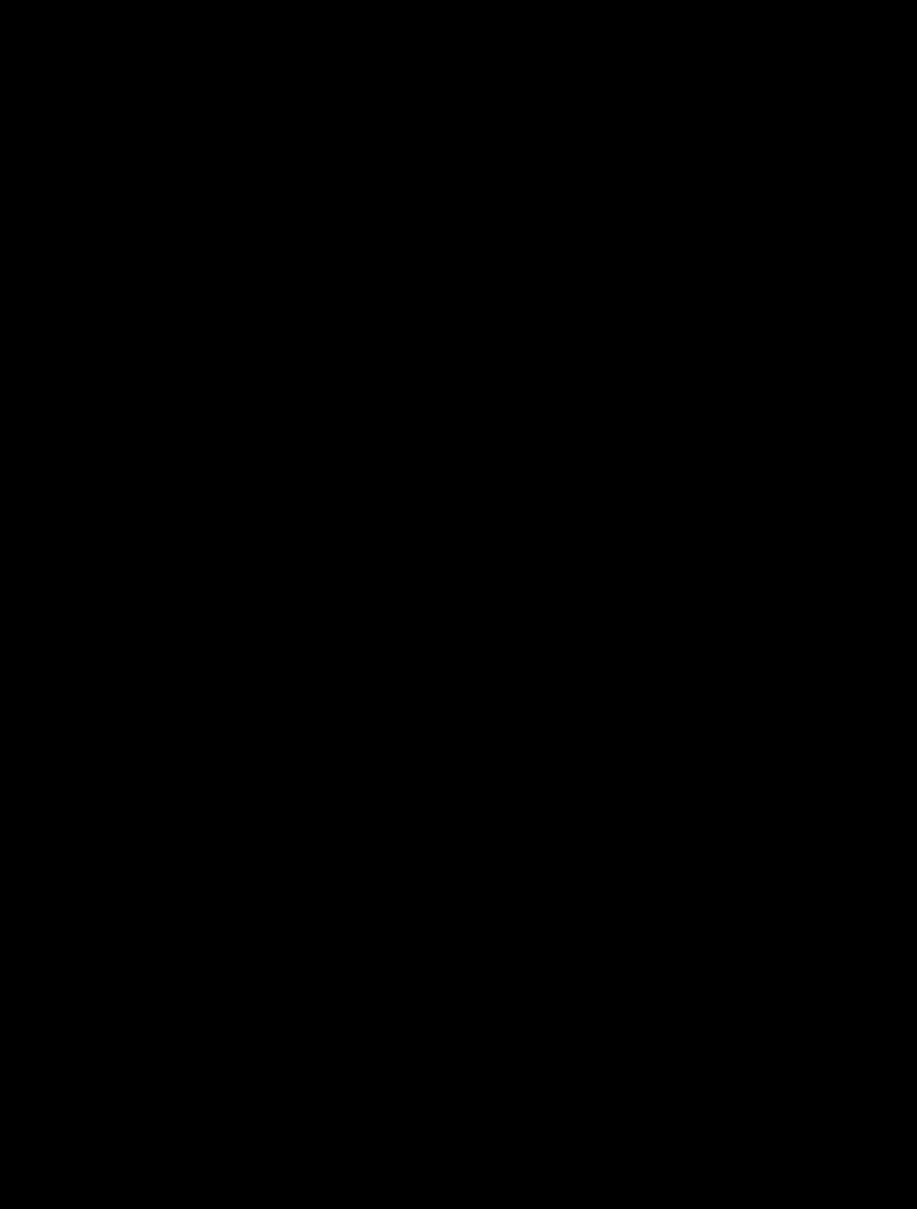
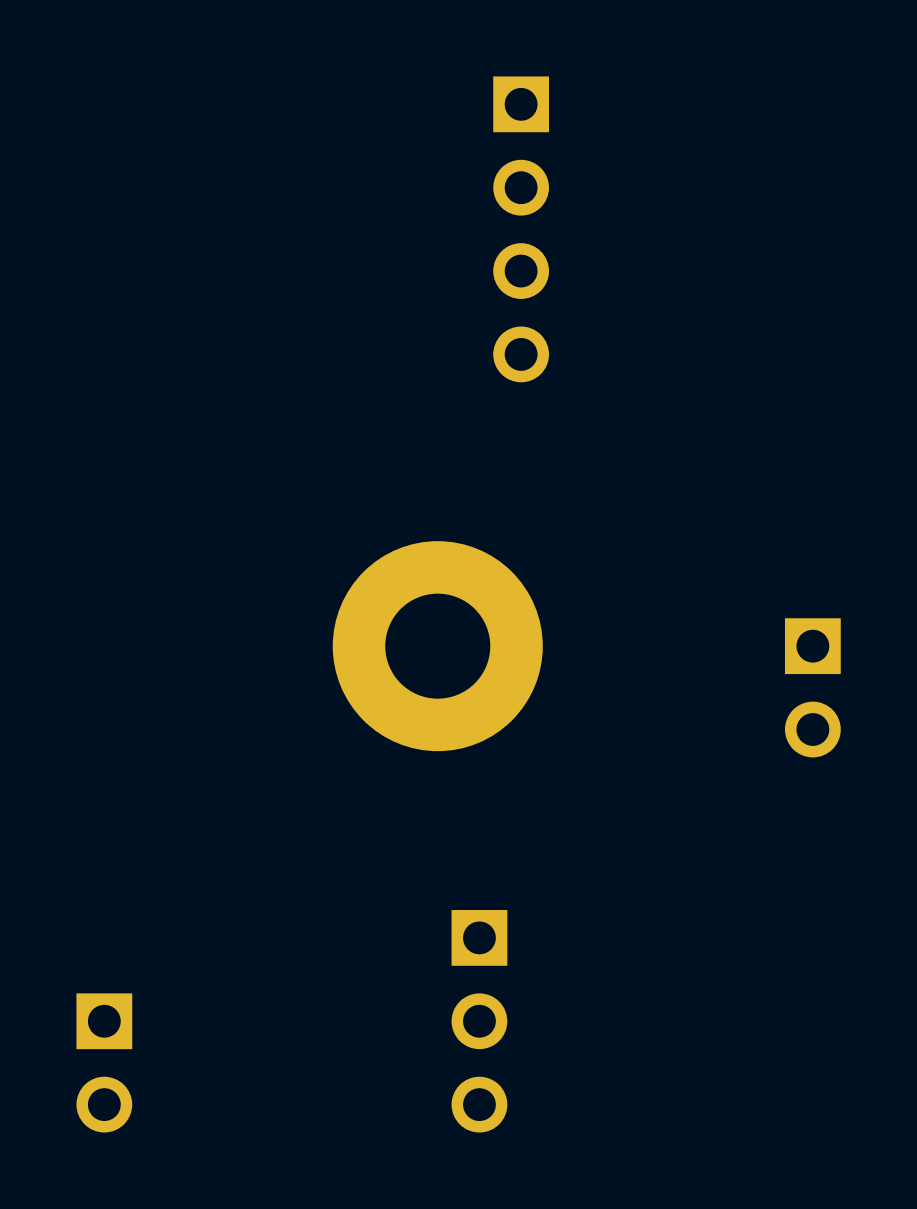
part: none -> (521, 229)
part: none -> (437, 646)
part: none -> (812, 687)
part: none -> (479, 1021)
part: none -> (104, 1062)

